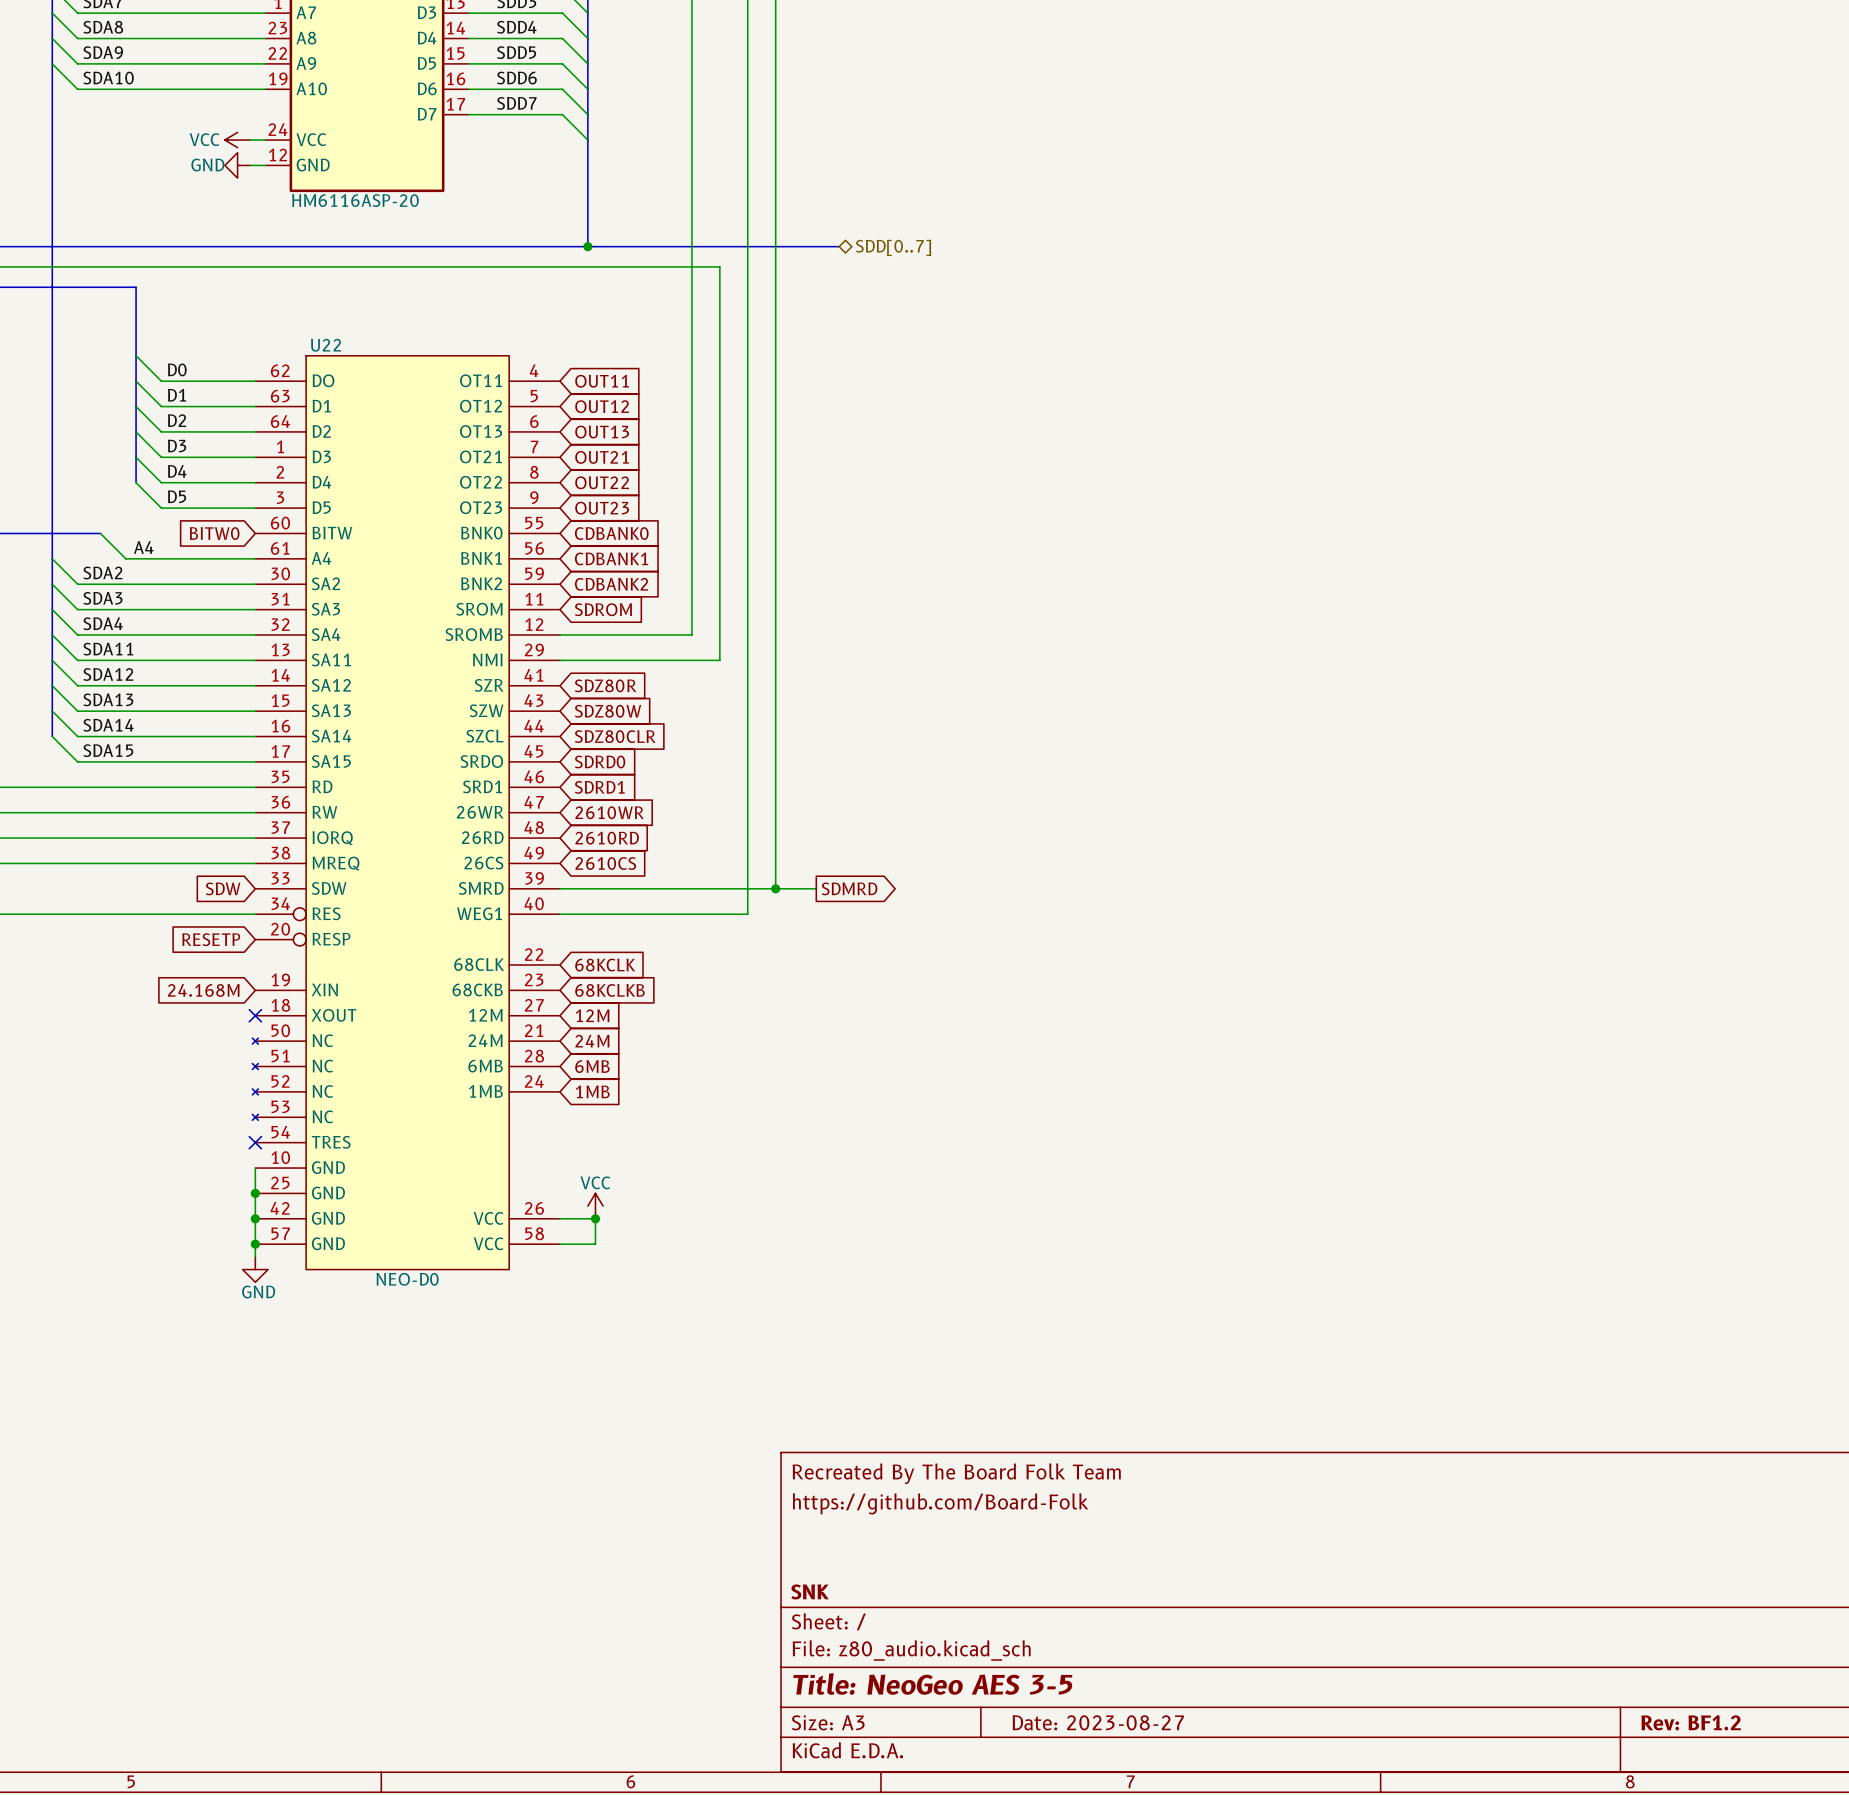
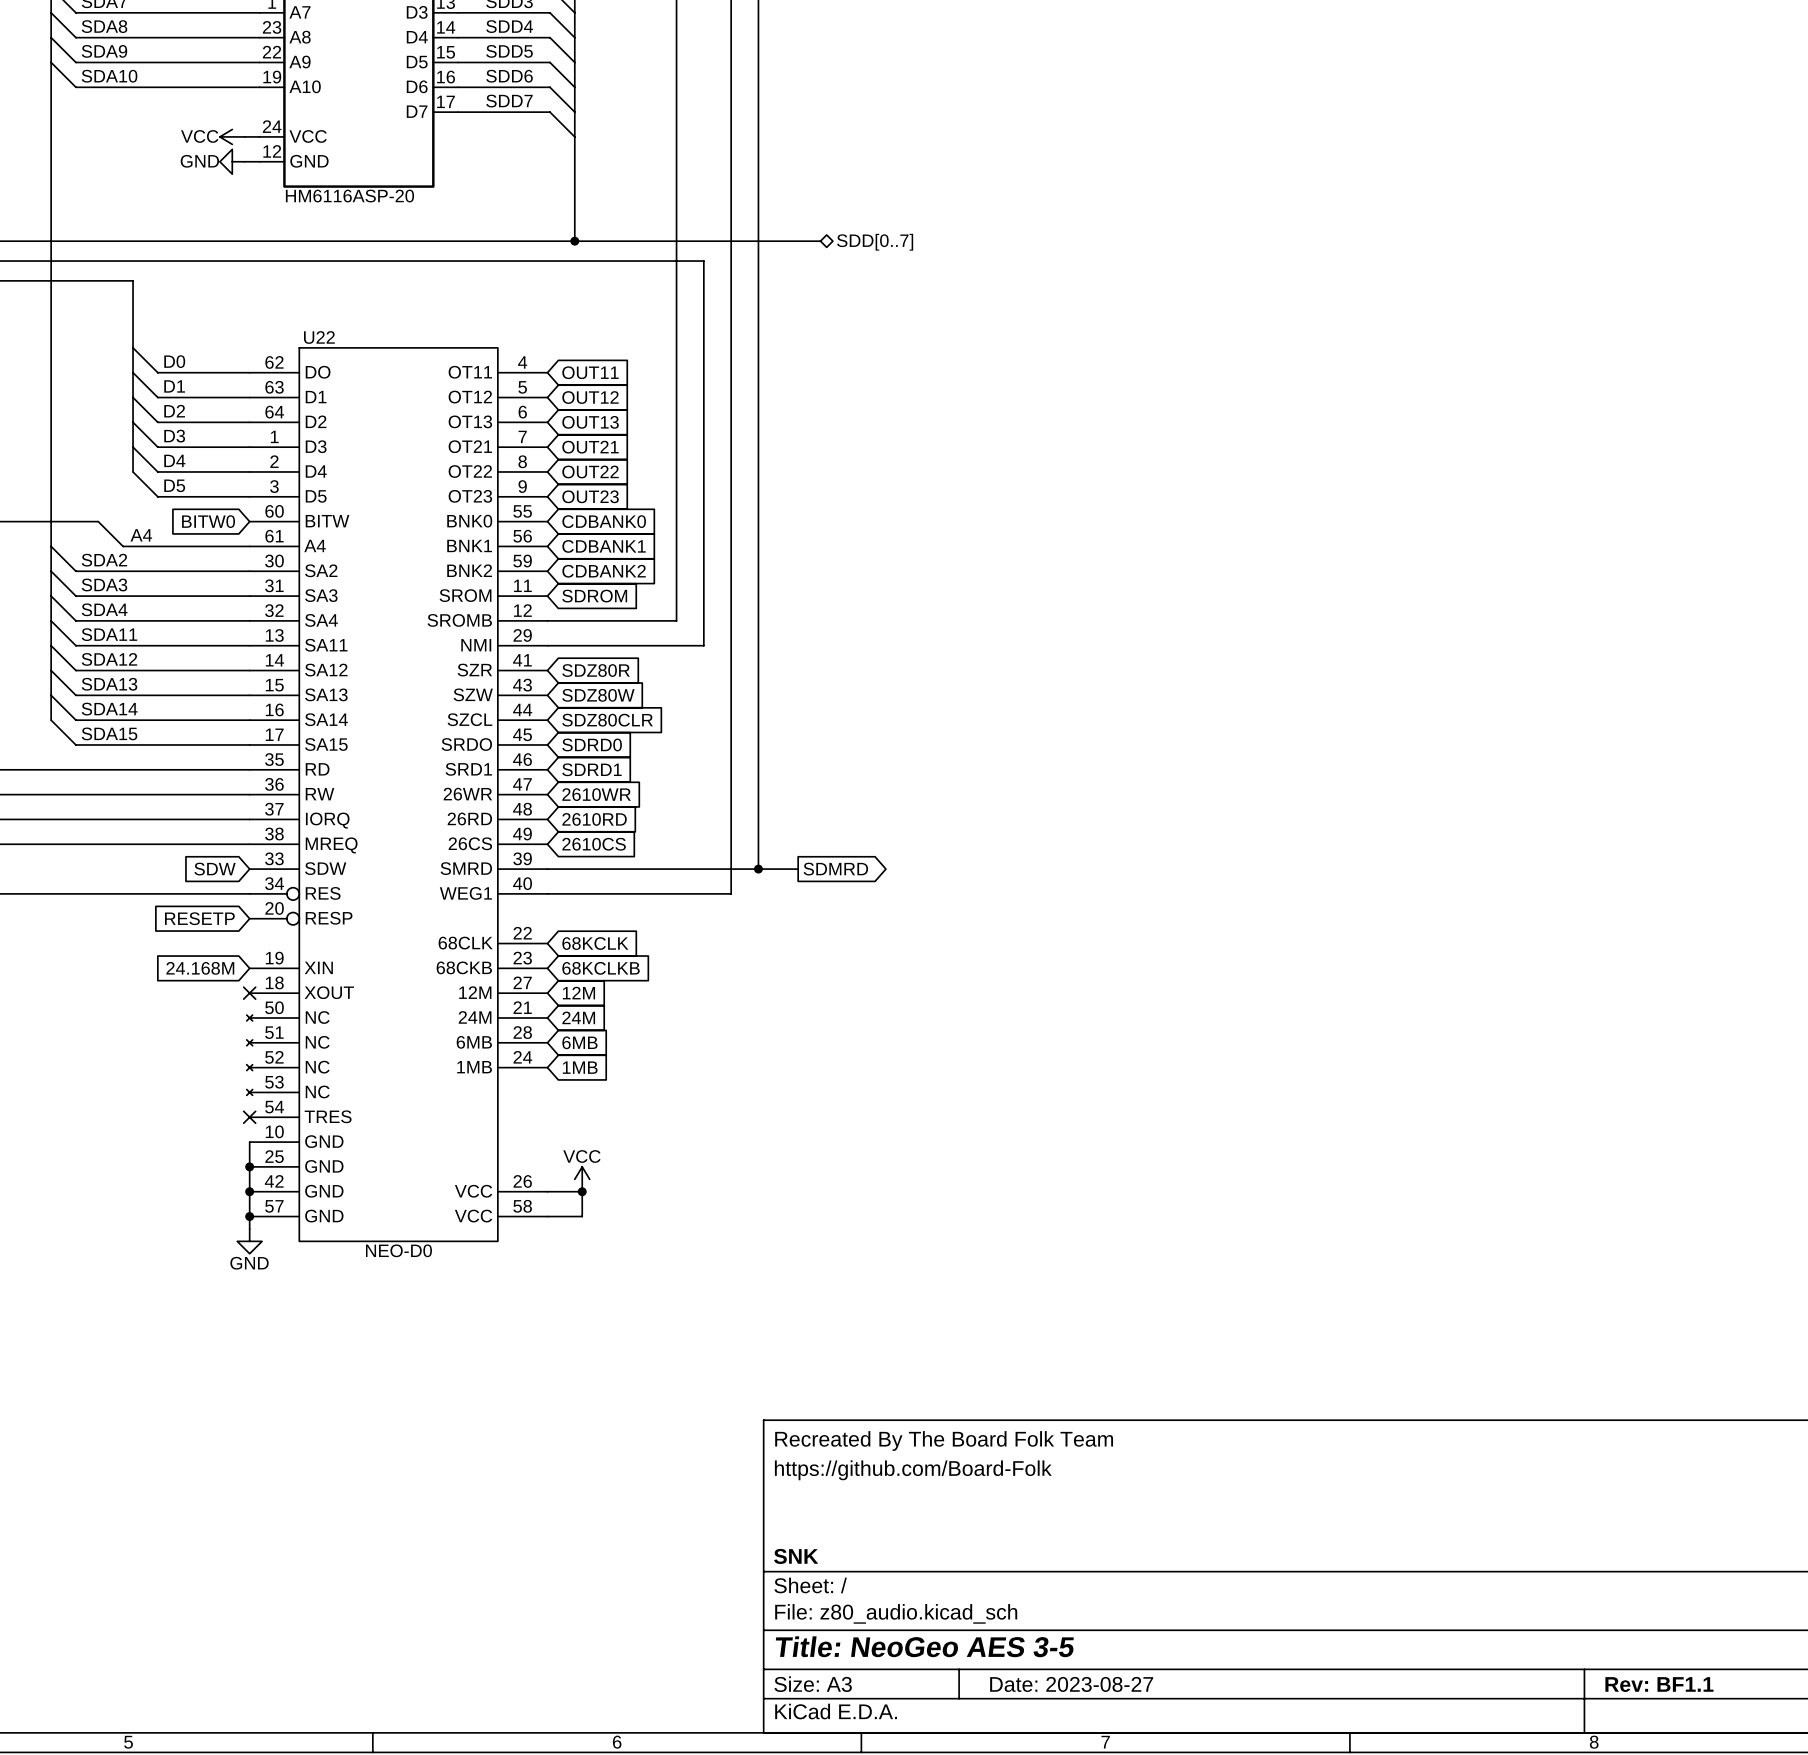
title block: Rev: BF1.2 (1691, 1722) -> Rev: BF1.1 (1659, 1684)

